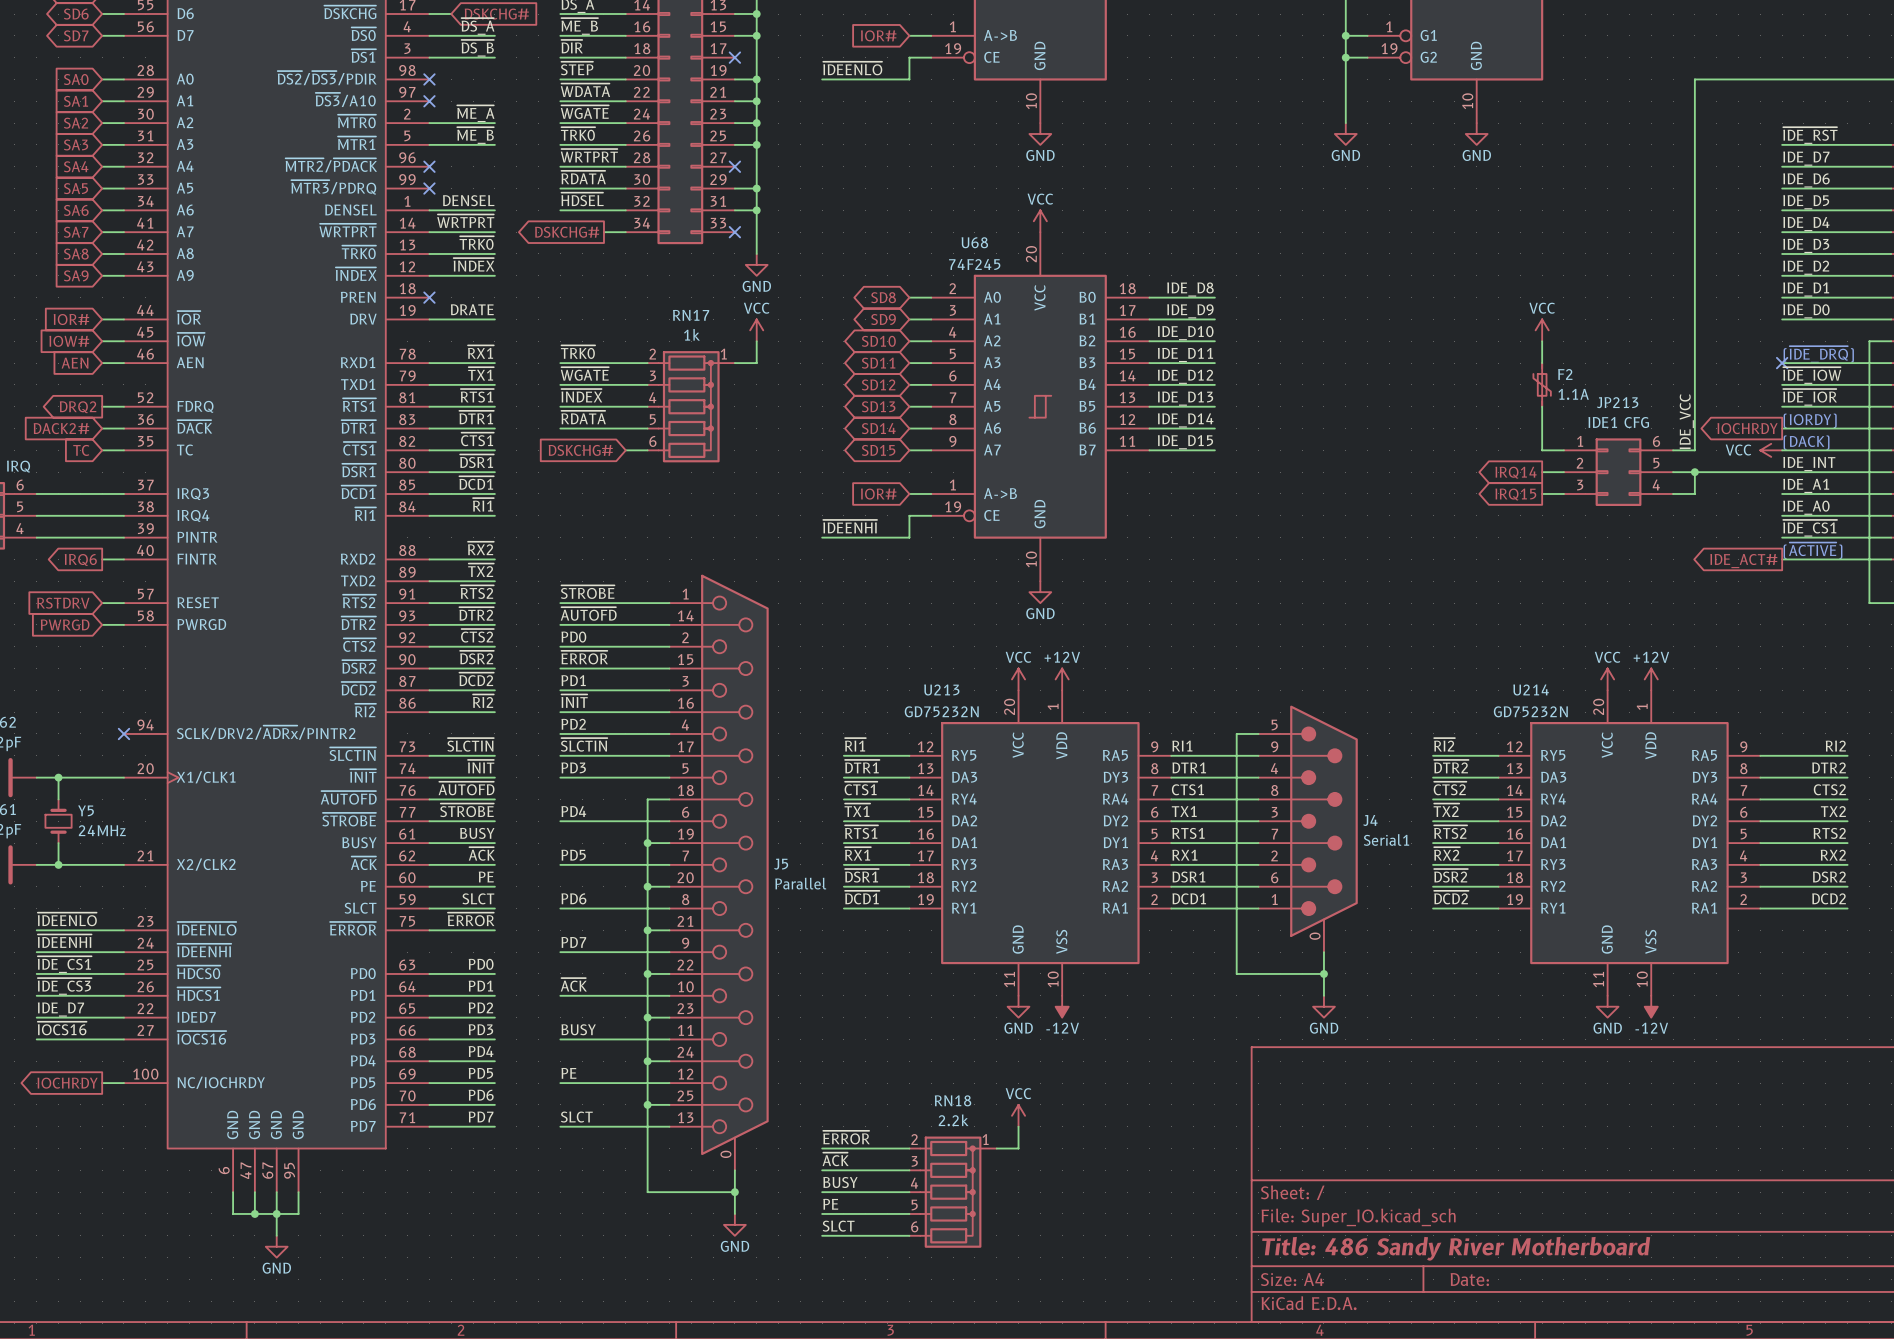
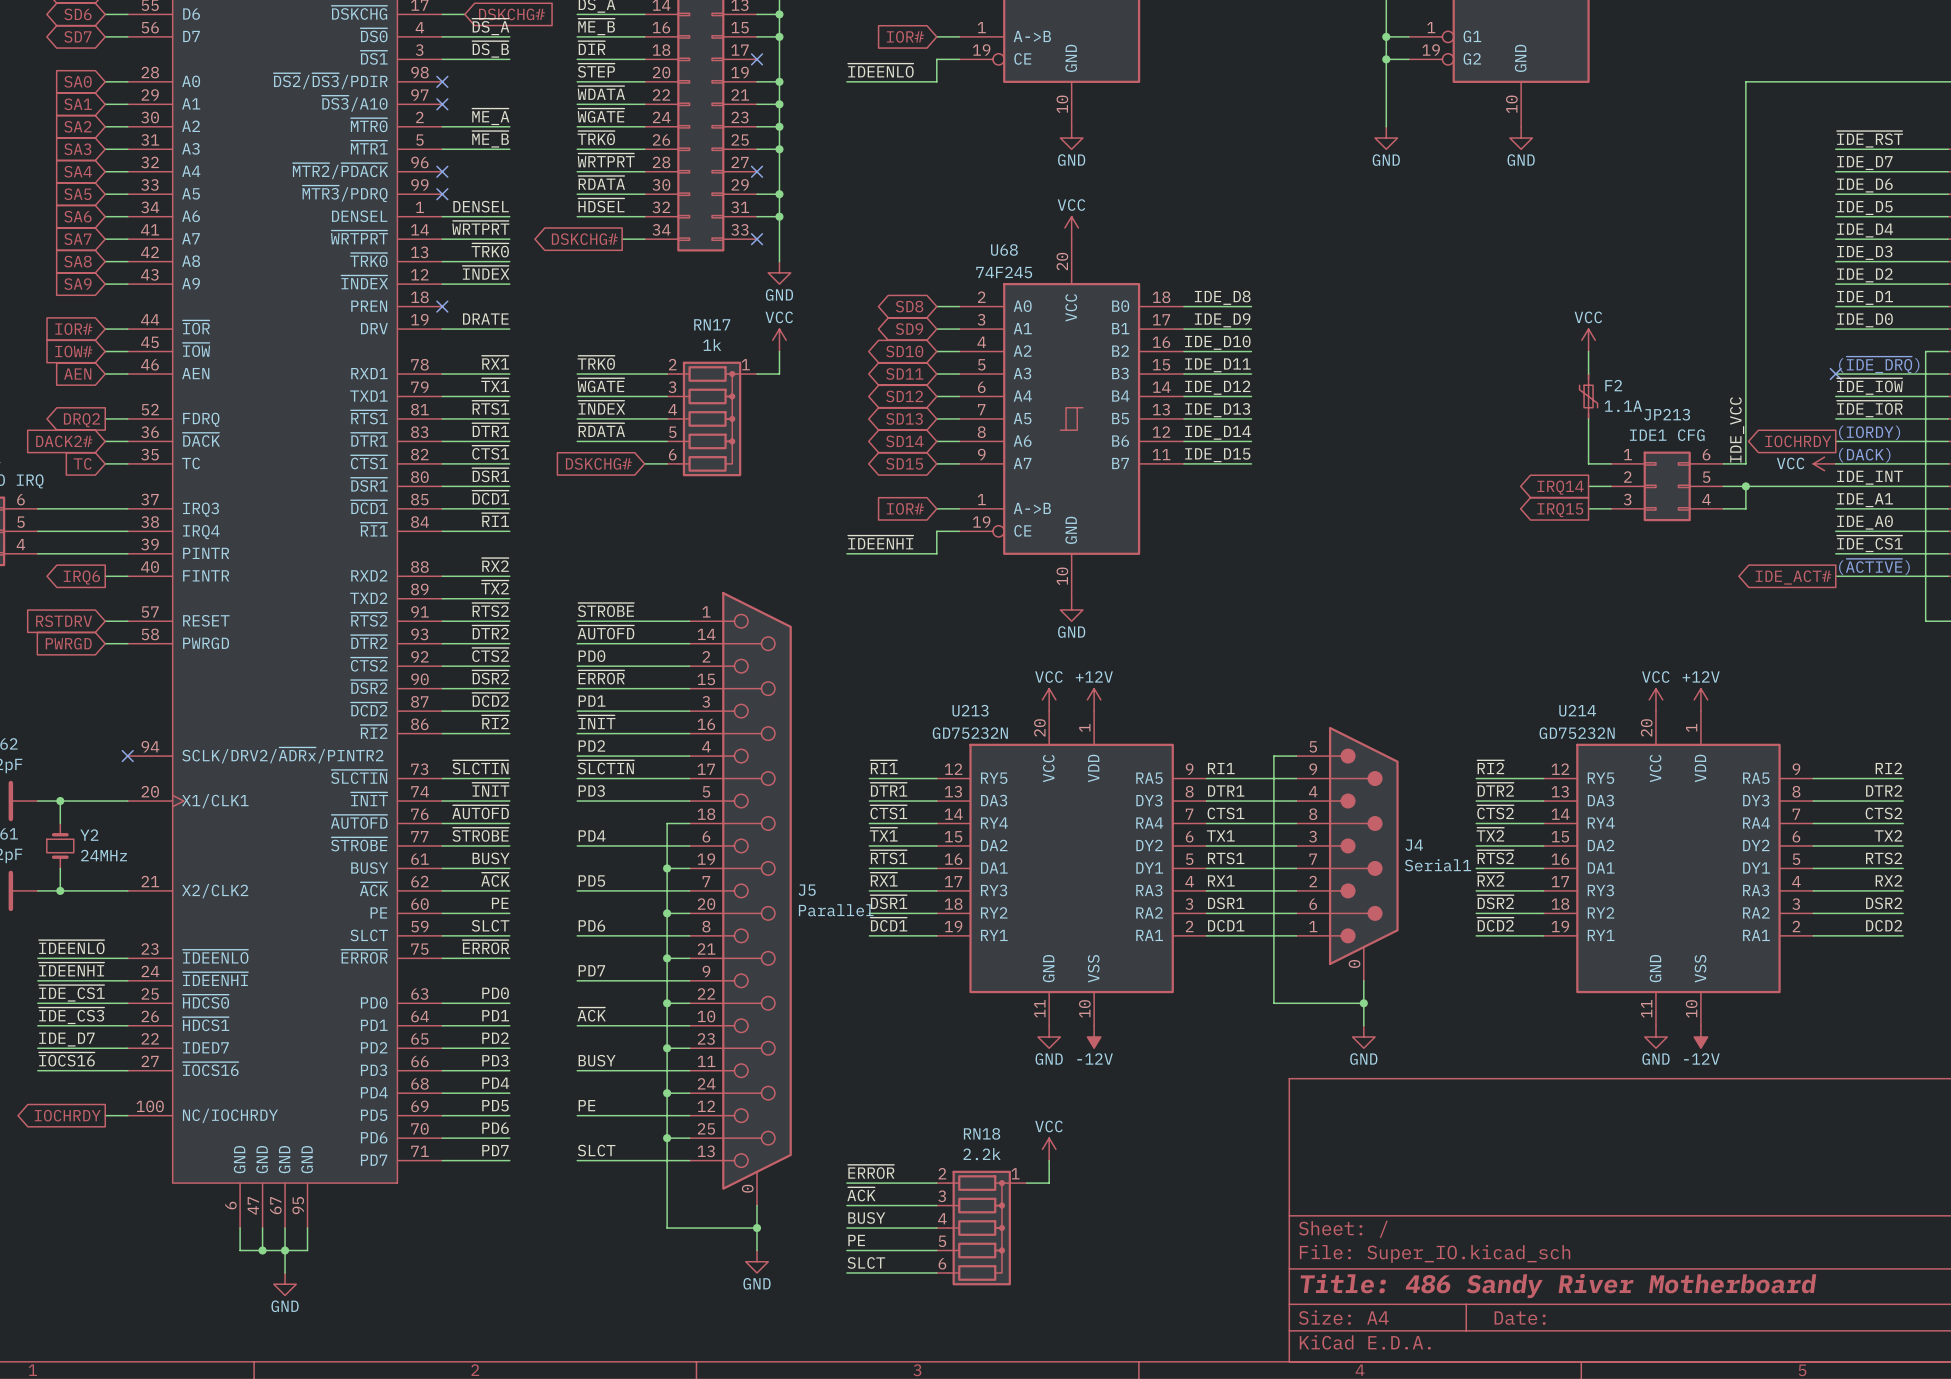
Y5 name: Y5 (86, 810) -> Y2 (89, 835)

